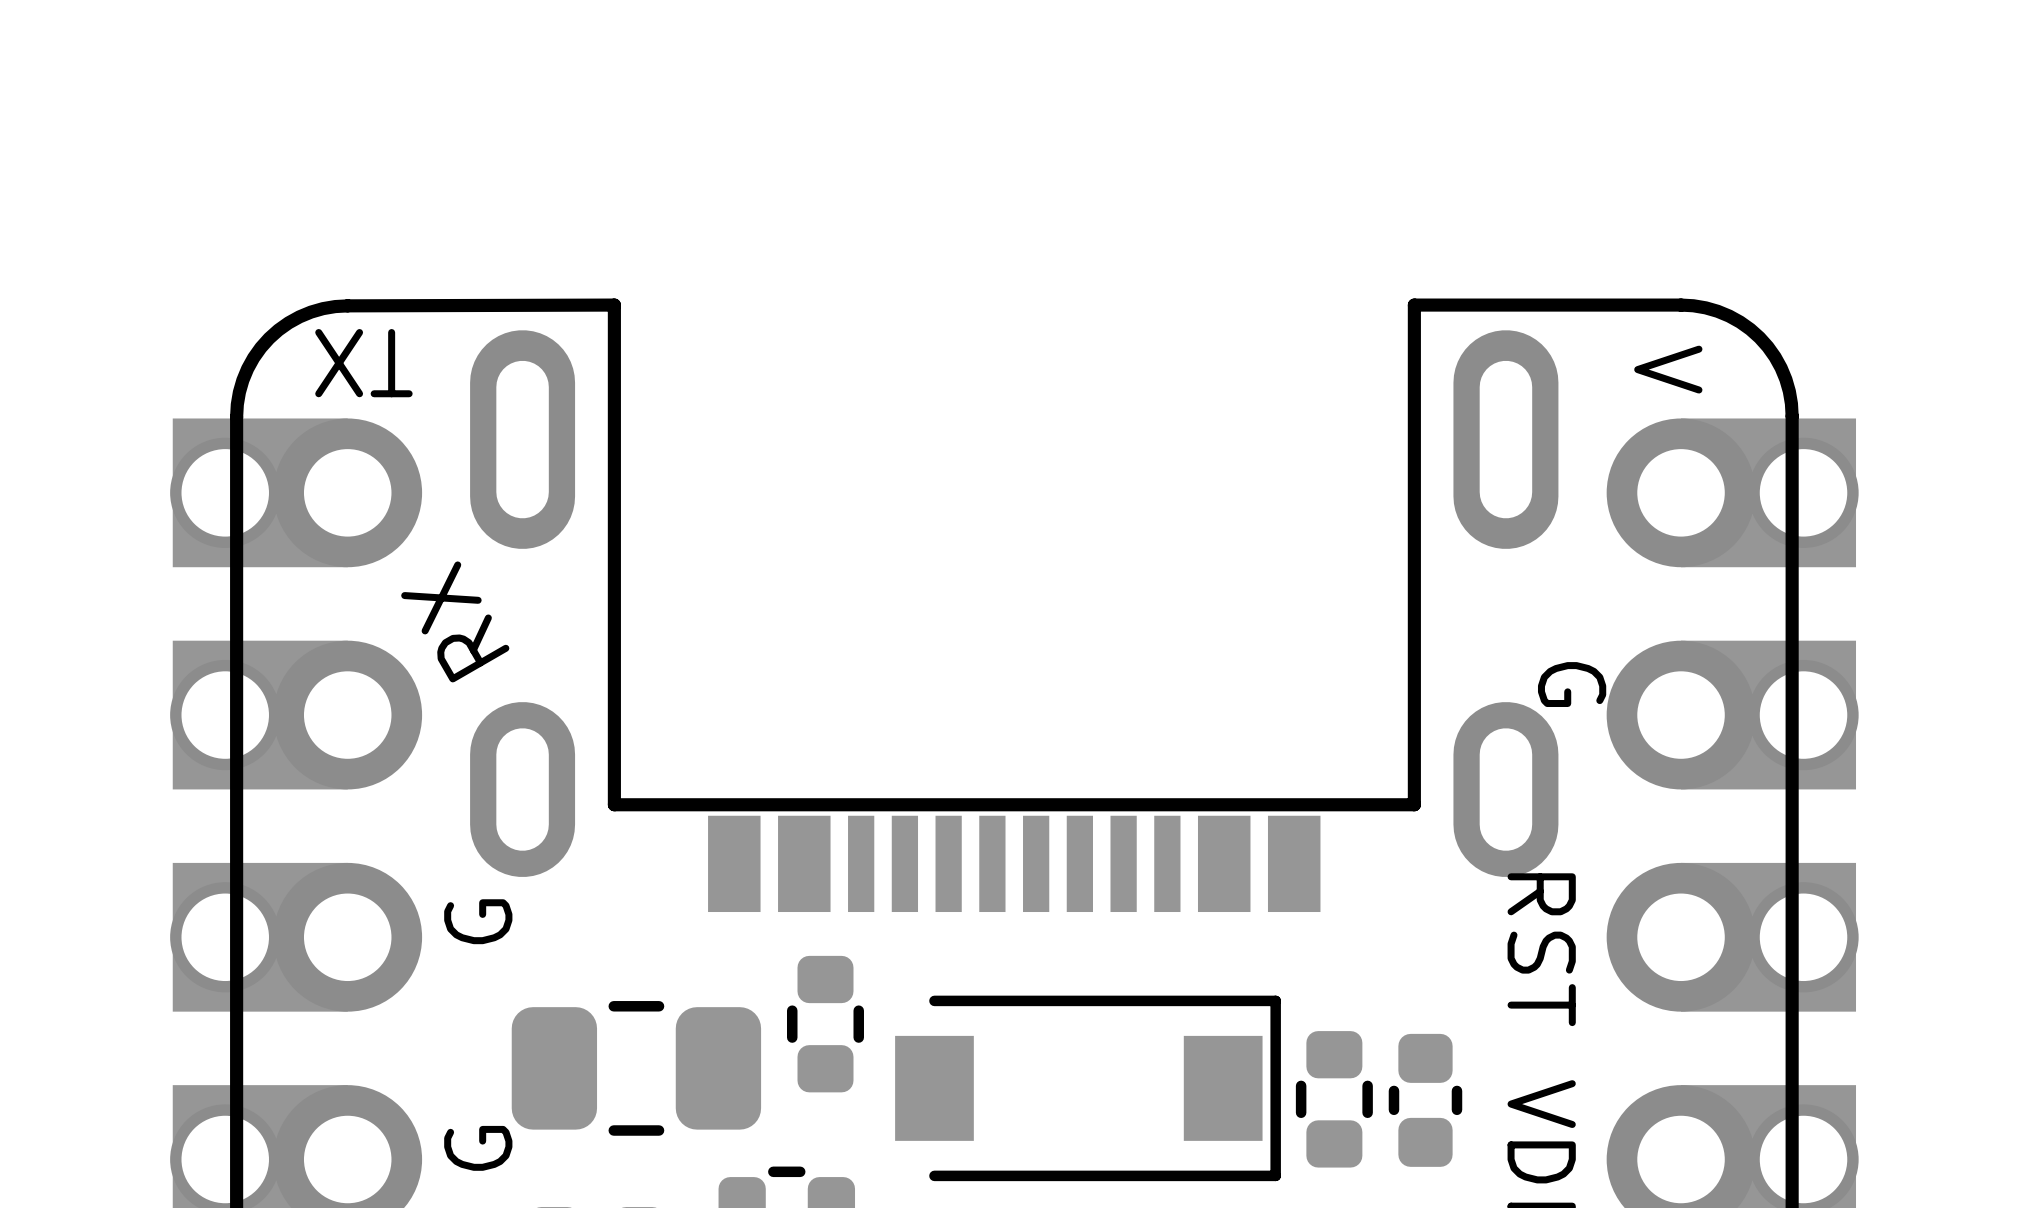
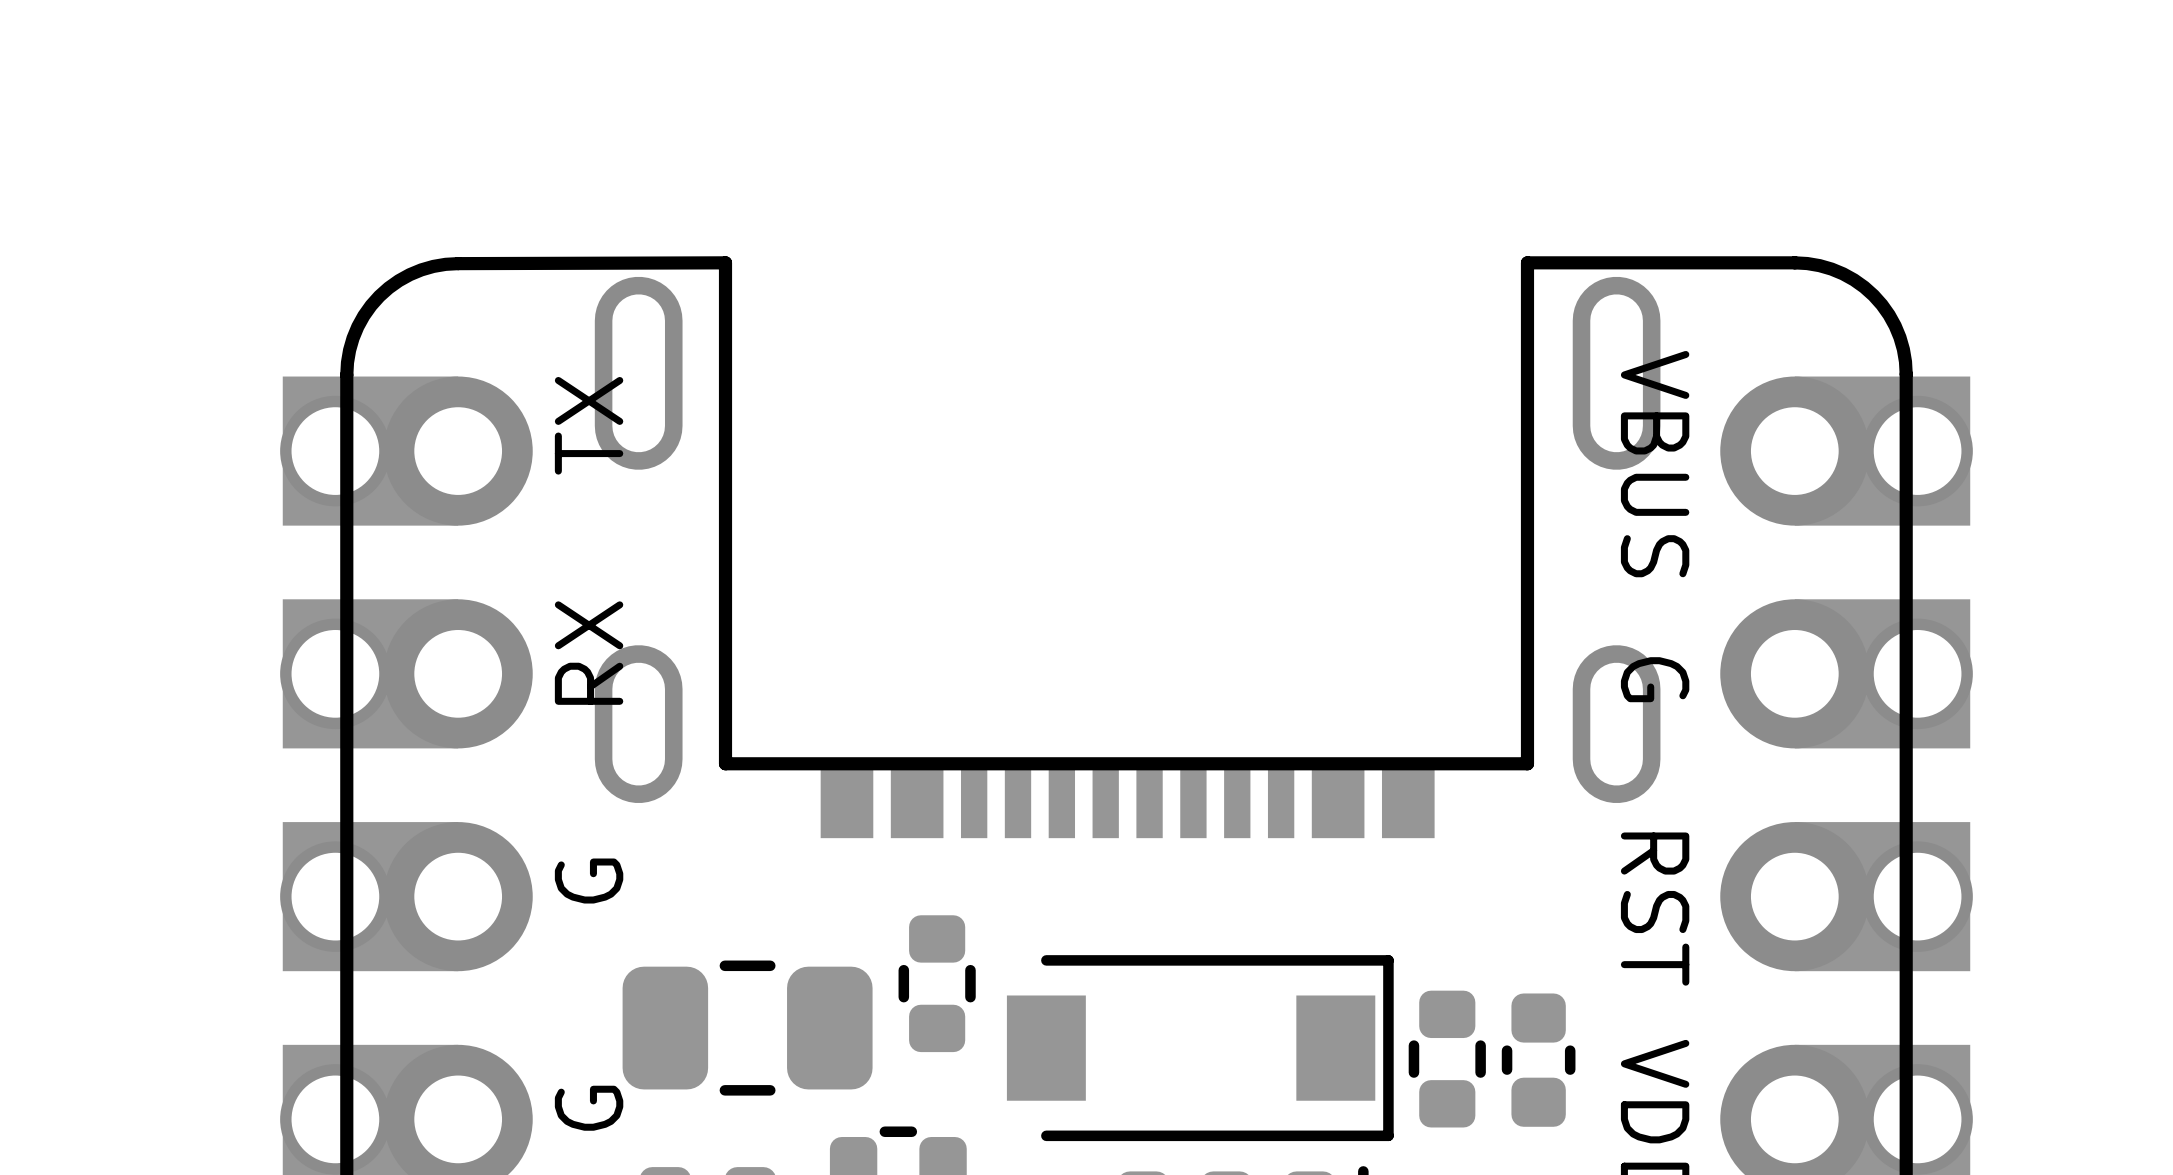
part footprint: [470, 330, 1559, 913] -> [594, 276, 1661, 839]
text rotation: 0° (363, 363) -> 90° clockwise (589, 425)
text position: TX (363, 363) -> TX (589, 425)
text: V (1668, 369) -> none
text: none -> VBUS (1655, 464)
text rotation: 0° (455, 621) -> 30° clockwise (589, 653)
text position: G (1572, 684) -> G (1655, 679)

